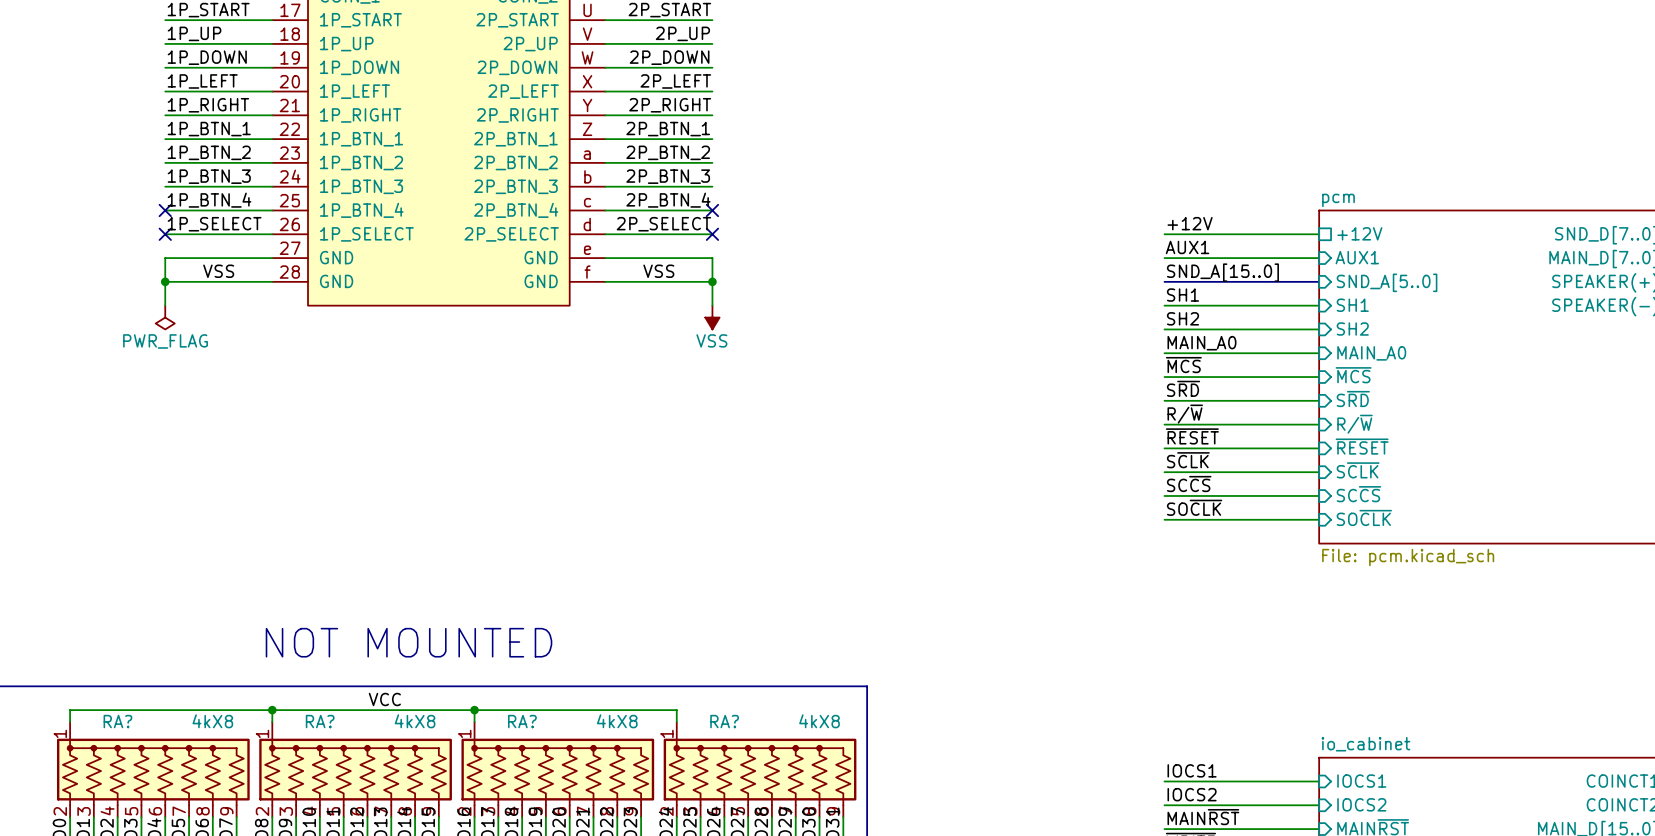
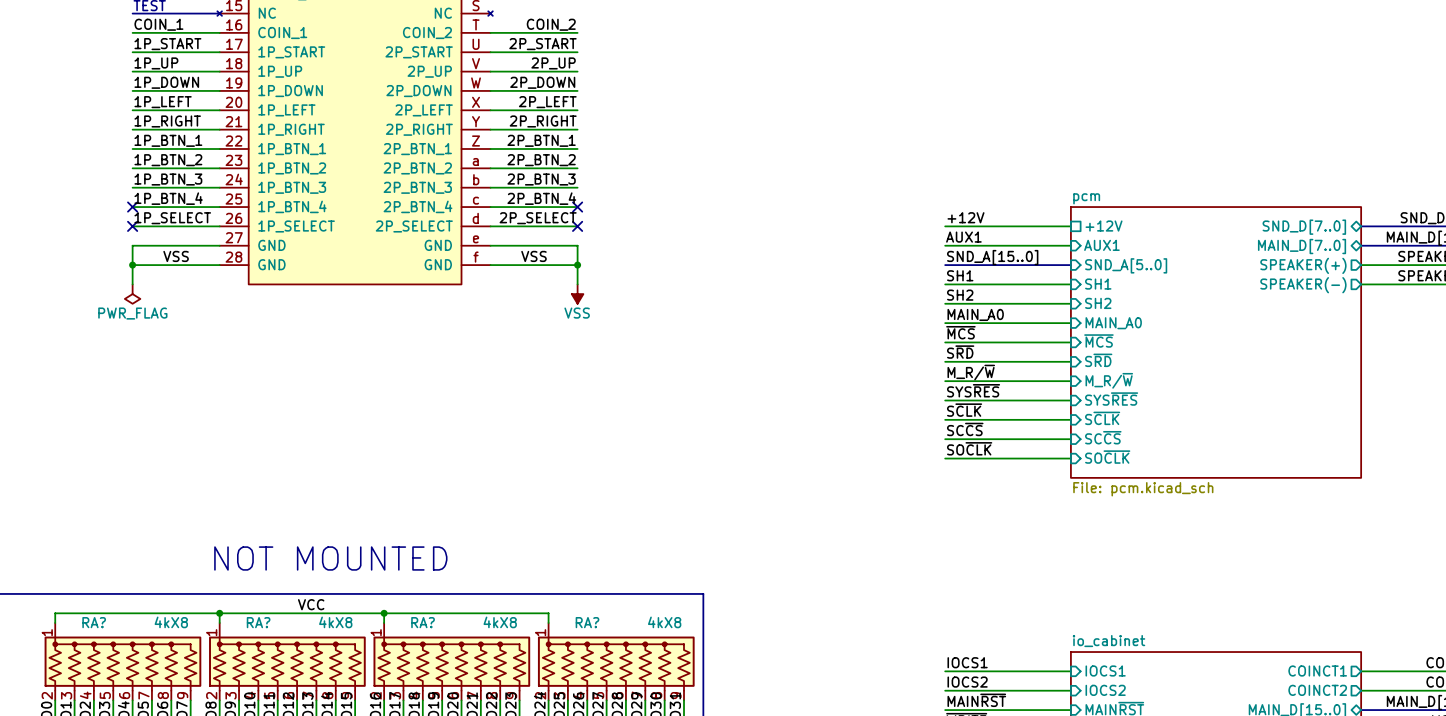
label: R/~{W} (1185, 414) -> M_R/~{W} (971, 372)
sheet pin: R/~{W} (1354, 424) -> M_R/~{W} (1109, 380)
label: ~{RESET} (1192, 436) -> SYS~{RES} (973, 390)
sheet pin: ~{RESET} (1362, 446) -> SYS~{RES} (1111, 399)

